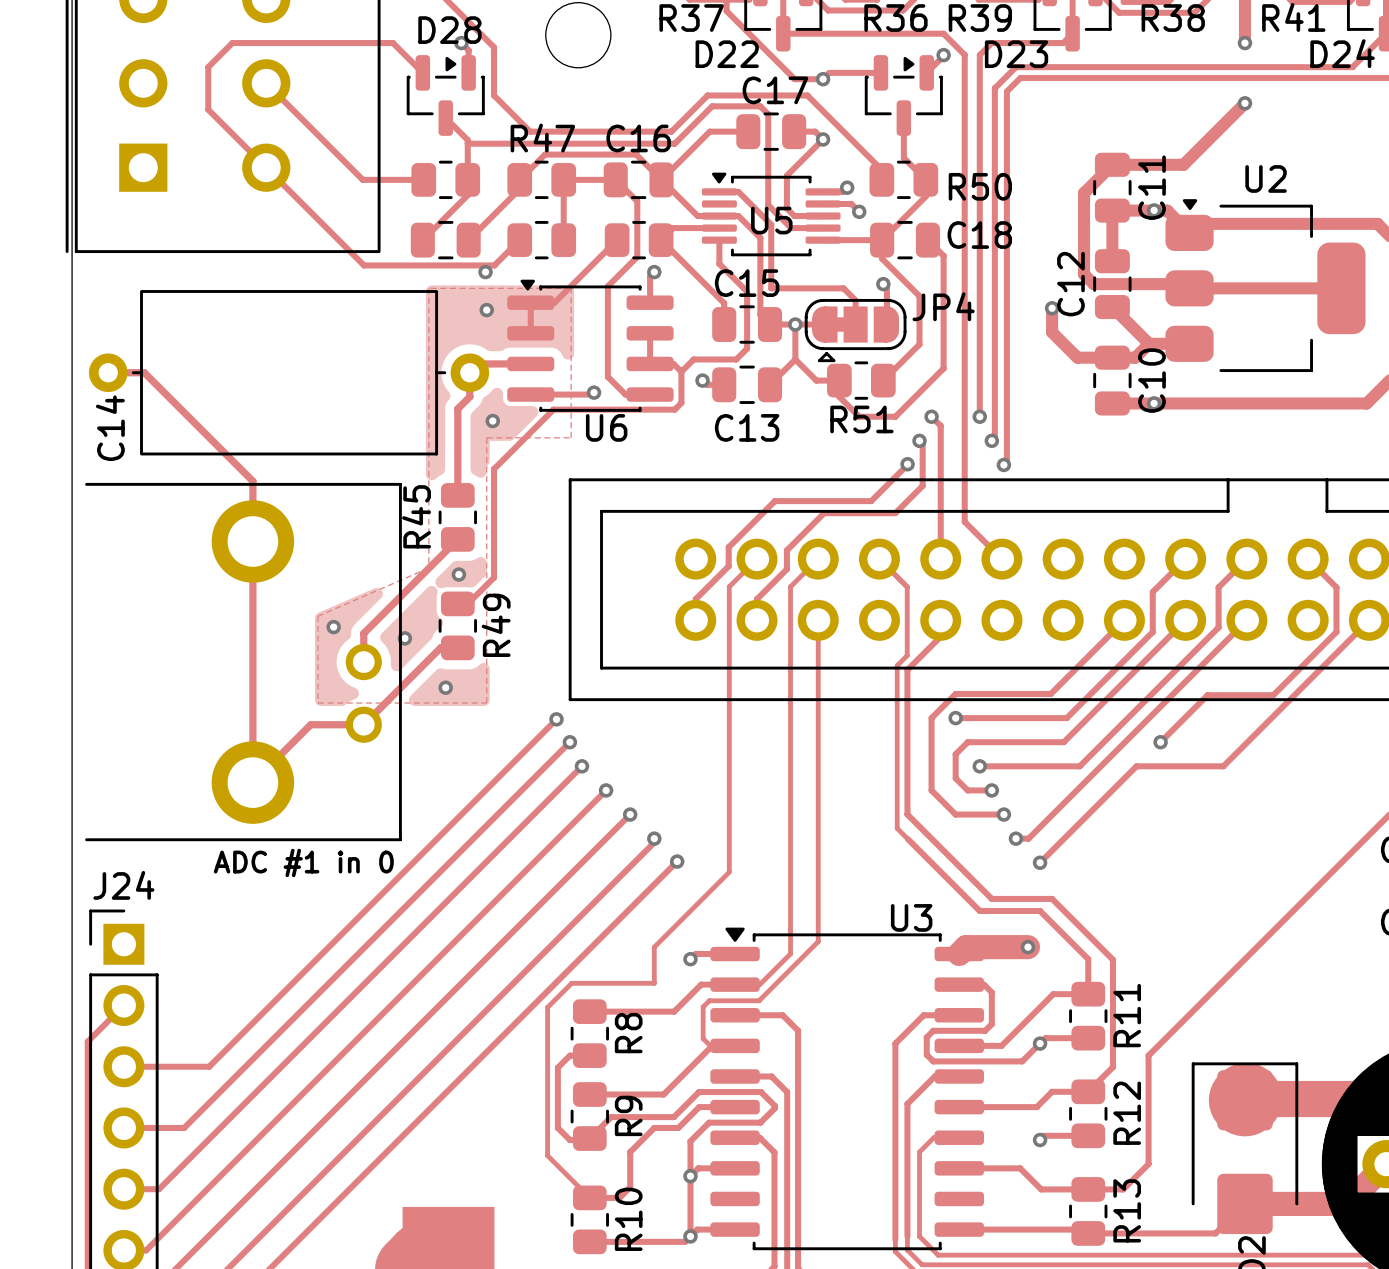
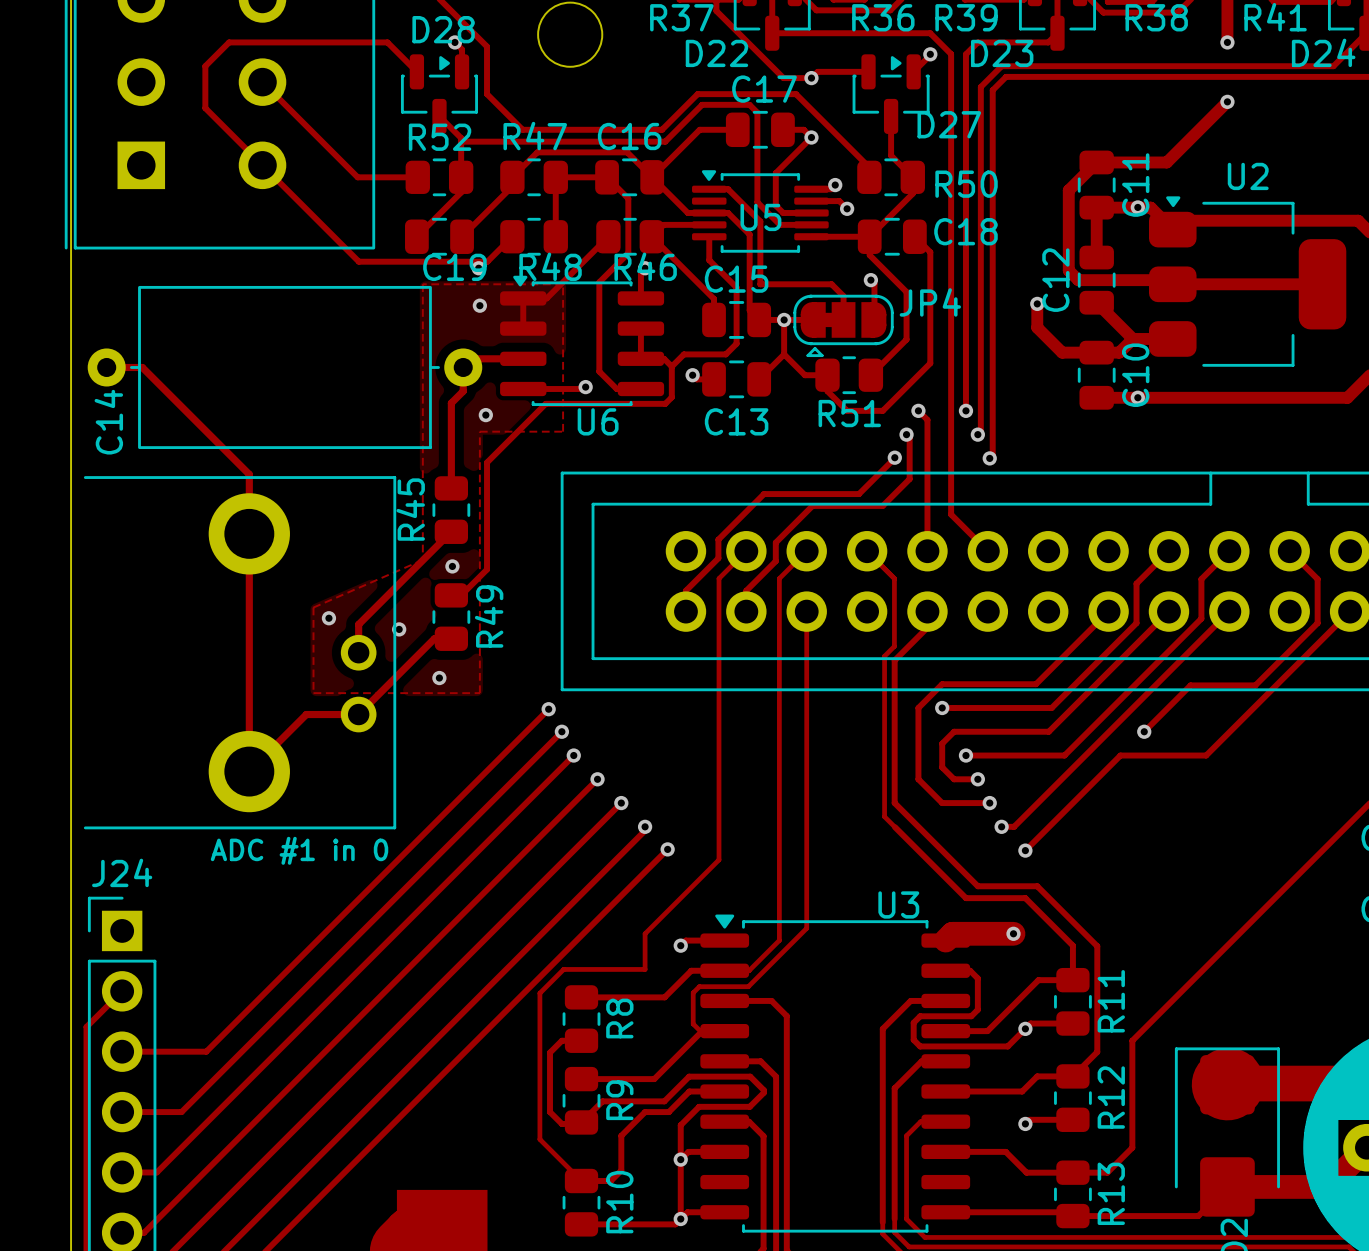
D27 name: none -> D27 (949, 124)
R52 name: none -> R52 (440, 137)
R48 name: none -> R48 (550, 266)
R46 name: none -> R46 (645, 266)
C19 name: none -> C19 (454, 267)

